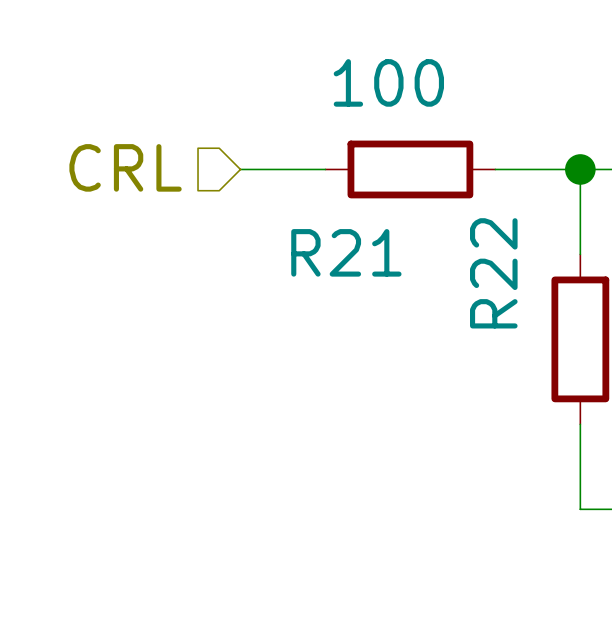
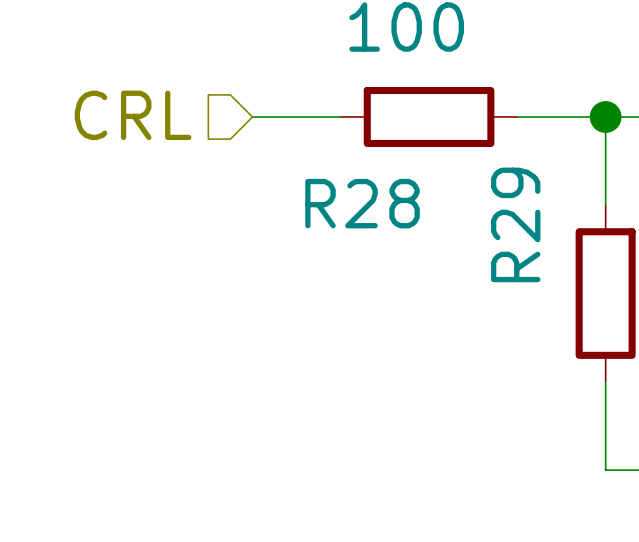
R21 name: R21 (346, 252) -> R28 (362, 203)
R22 name: R22 (493, 273) -> R29 (515, 224)

